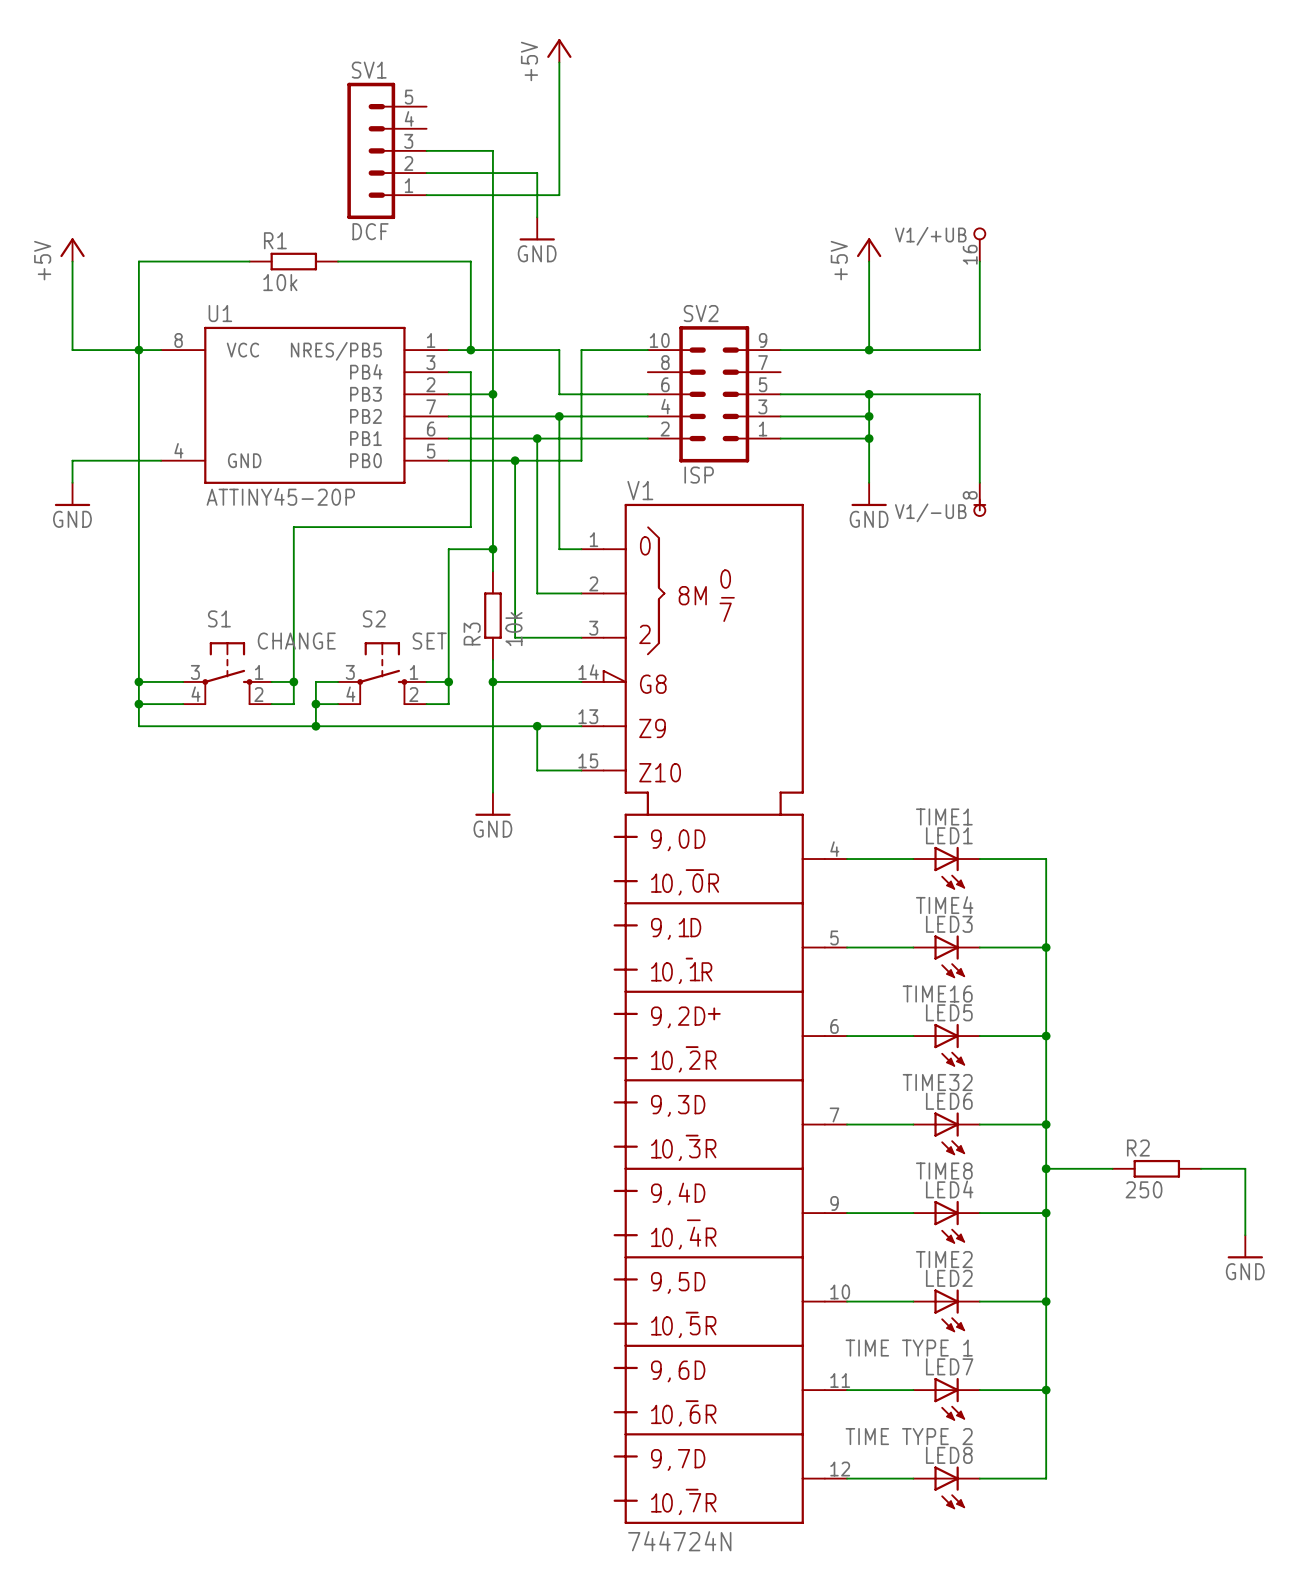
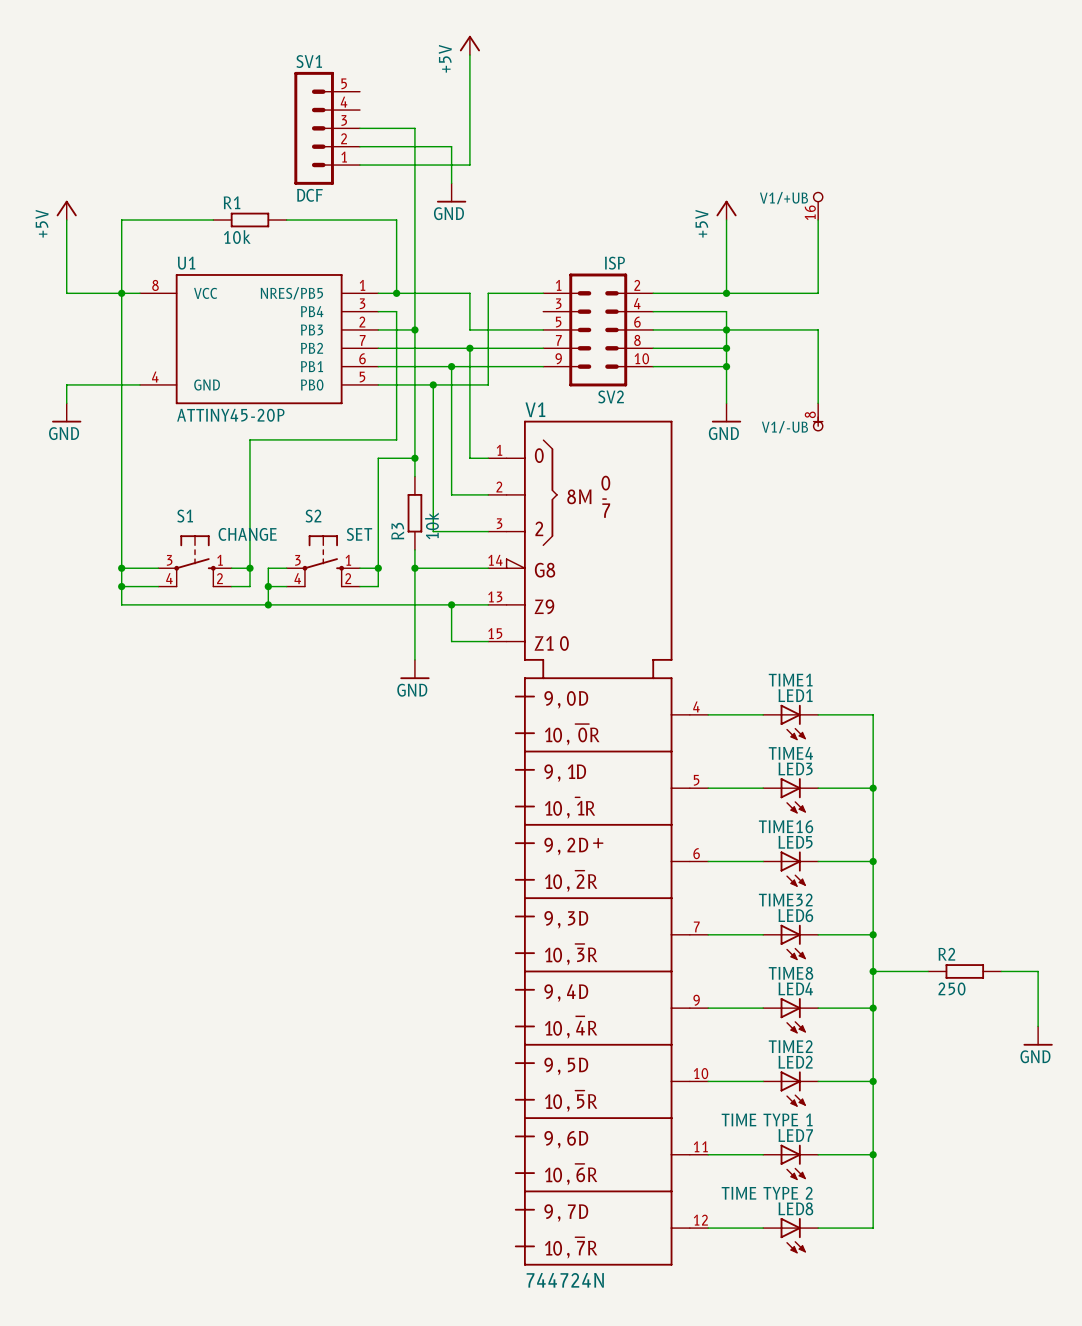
wire: none -> (653, 311) (726, 311) (726, 329)
SV2 rotation: 0° (714, 394) -> 180° (598, 329)

